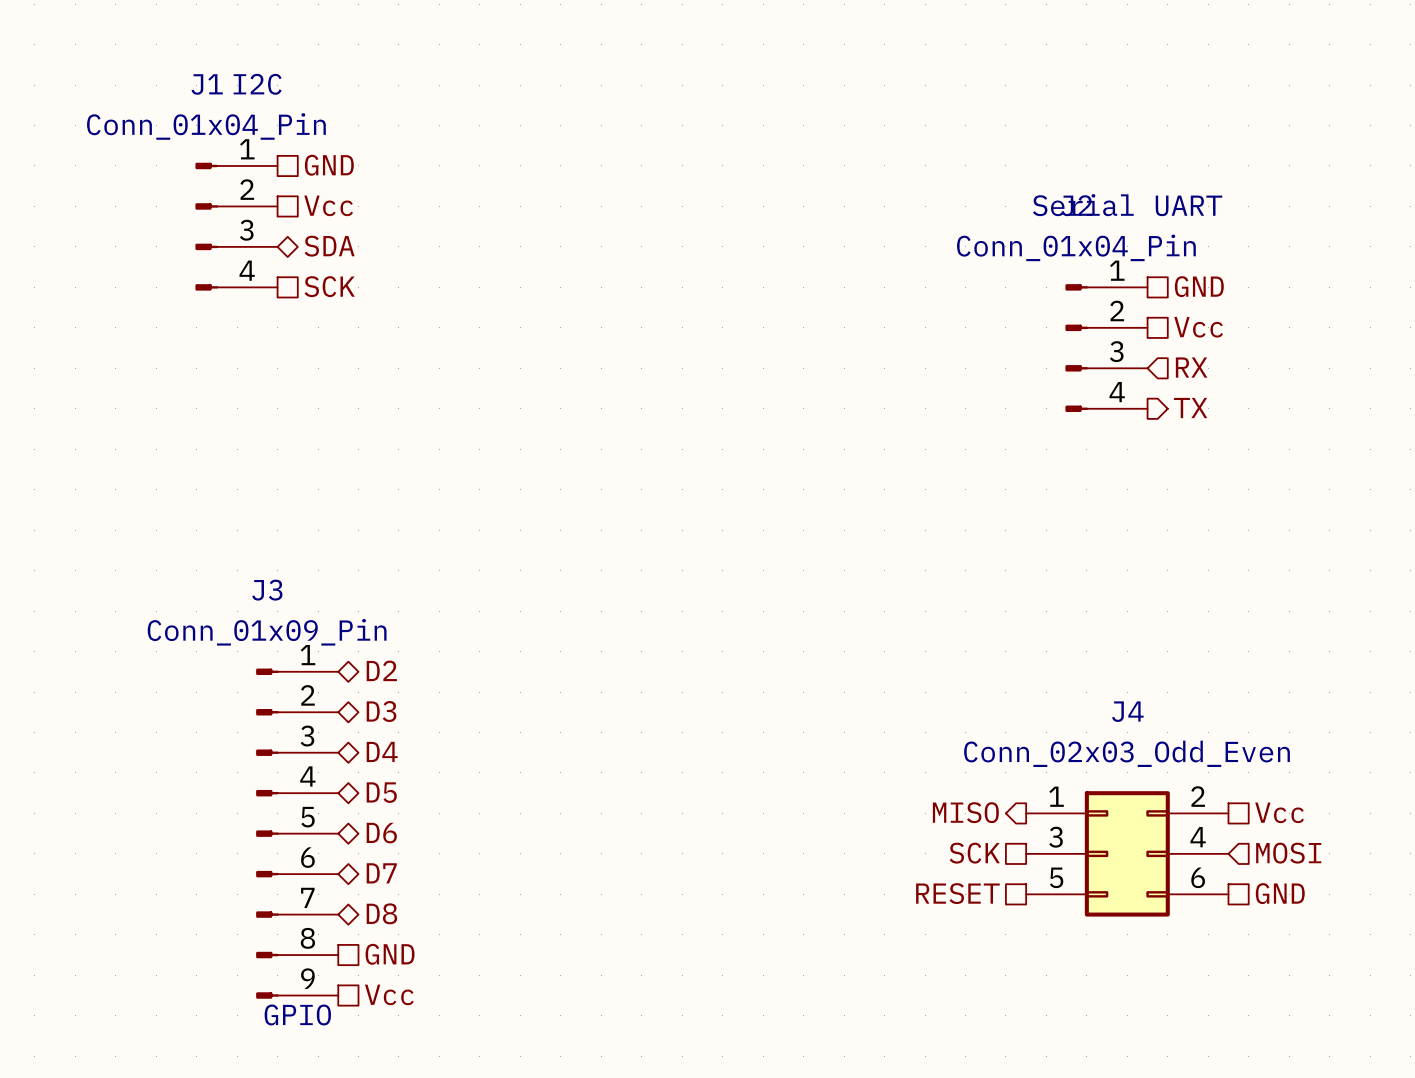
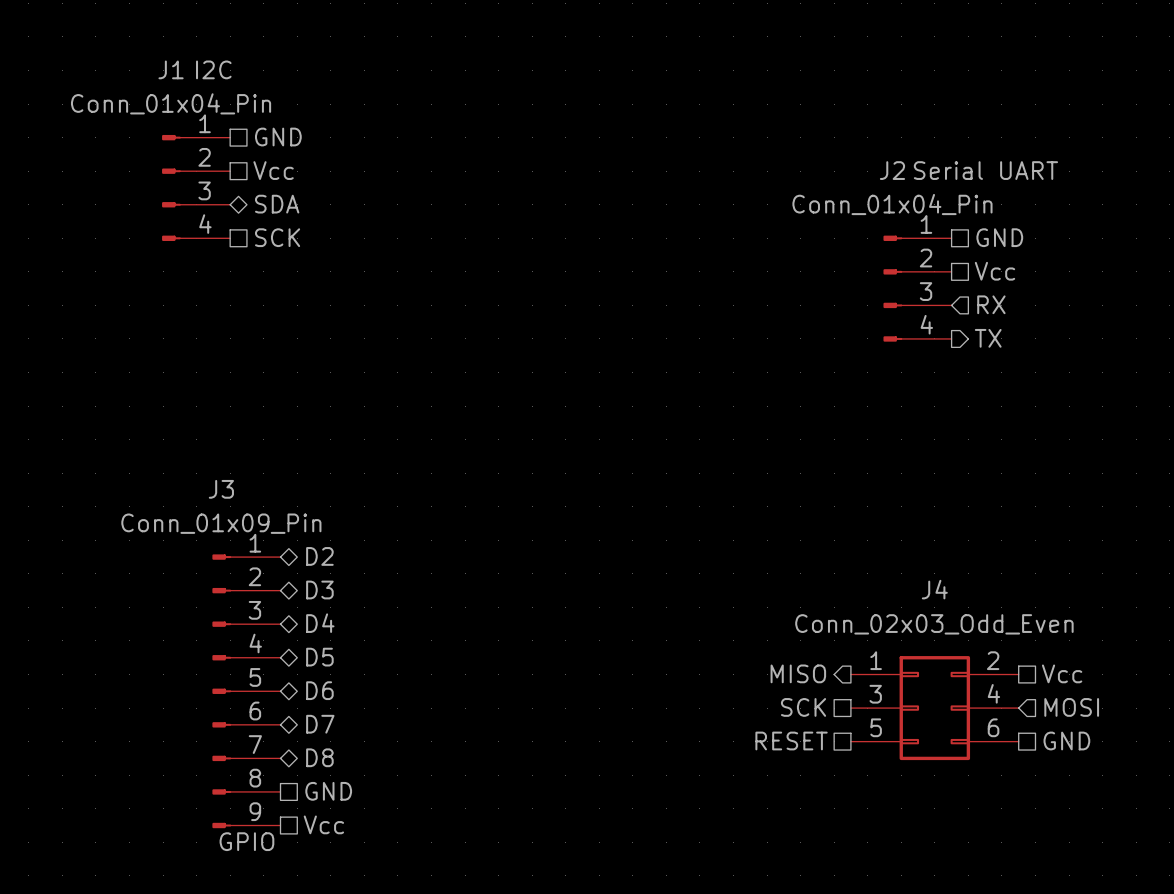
J2 text position: Serial UART (1127, 205) -> Serial UART (985, 170)

